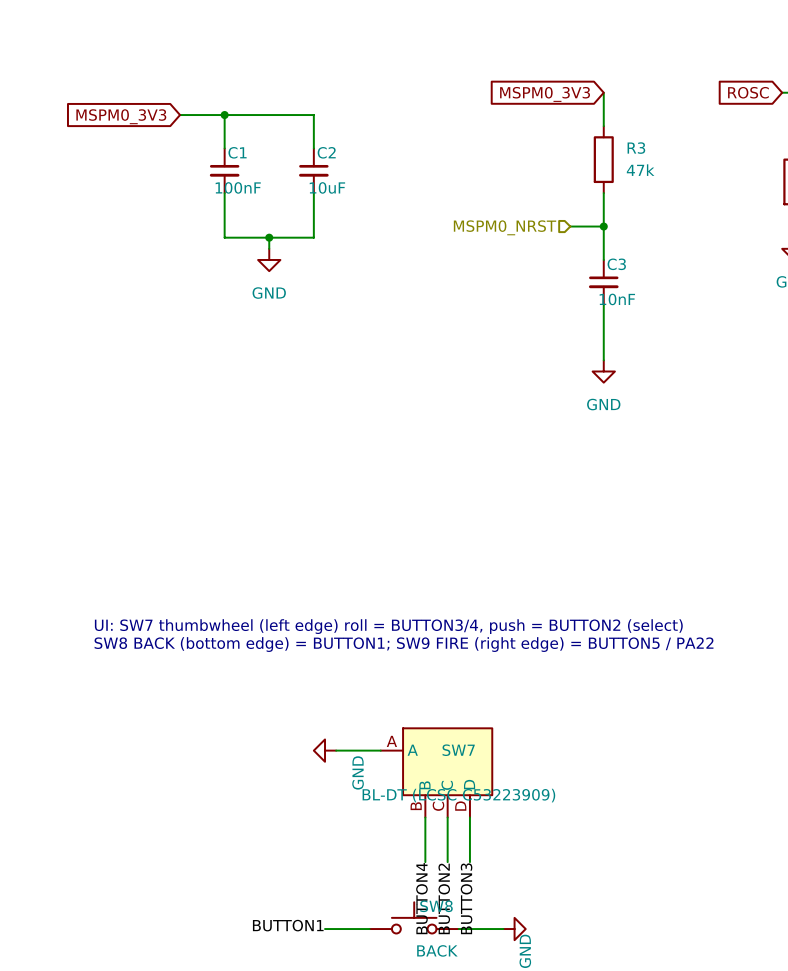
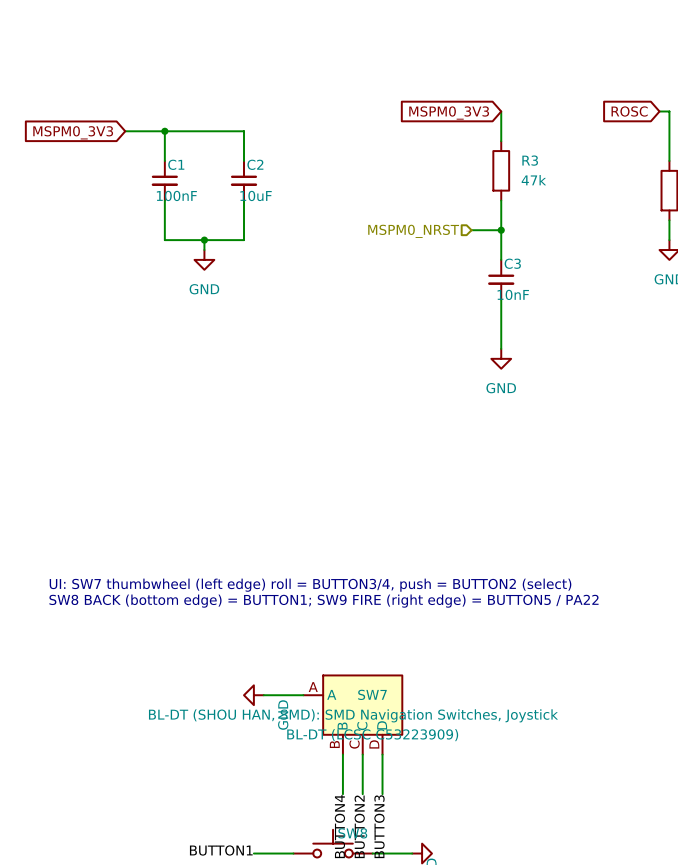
SW7 text: none -> BL-DT (SHOU HAN, SMD): SMD Navigation Switches, Joystick (353, 715)

